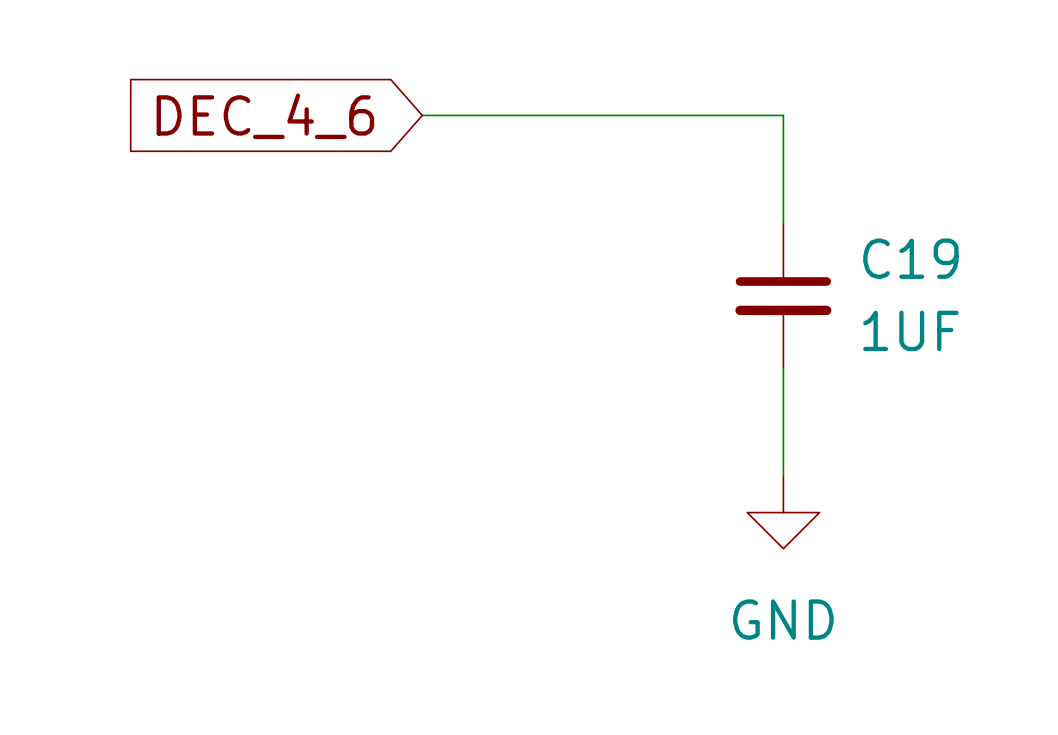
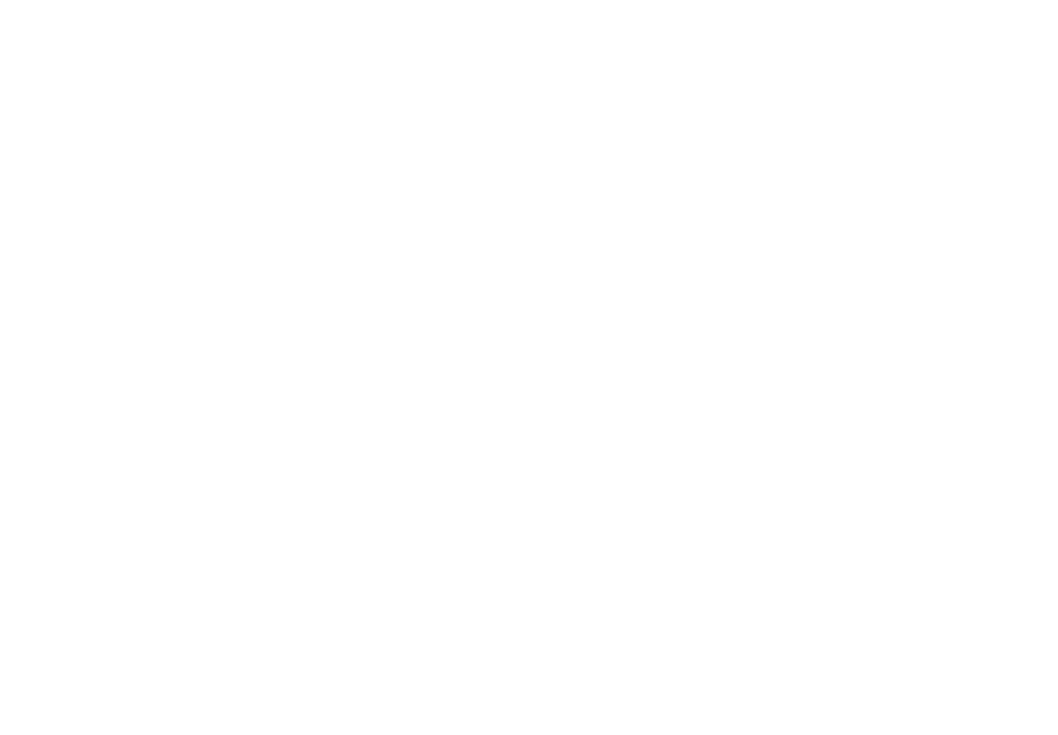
wire: (422, 115) (783, 115) (783, 223) -> none
global label: DEC_4_6 (265, 116) -> none
C19: 1UF (783, 295) -> none
wire: (783, 368) (783, 476) -> none
power symbol: GND (783, 512) -> none

